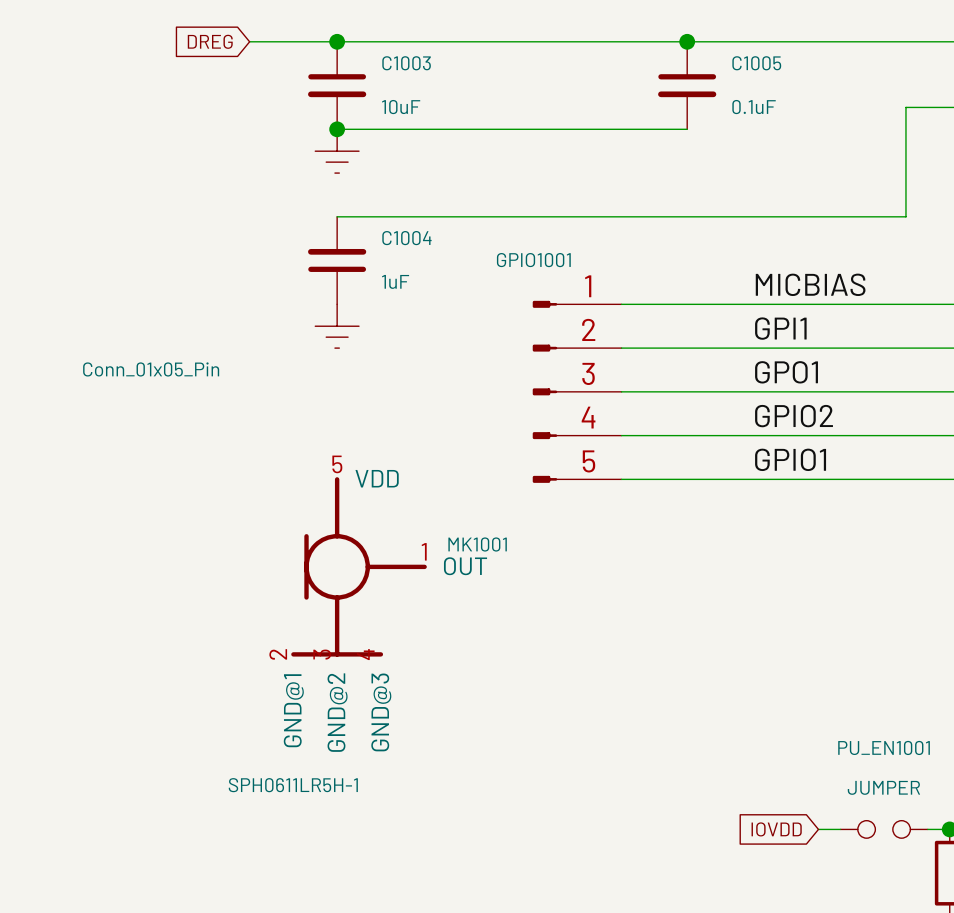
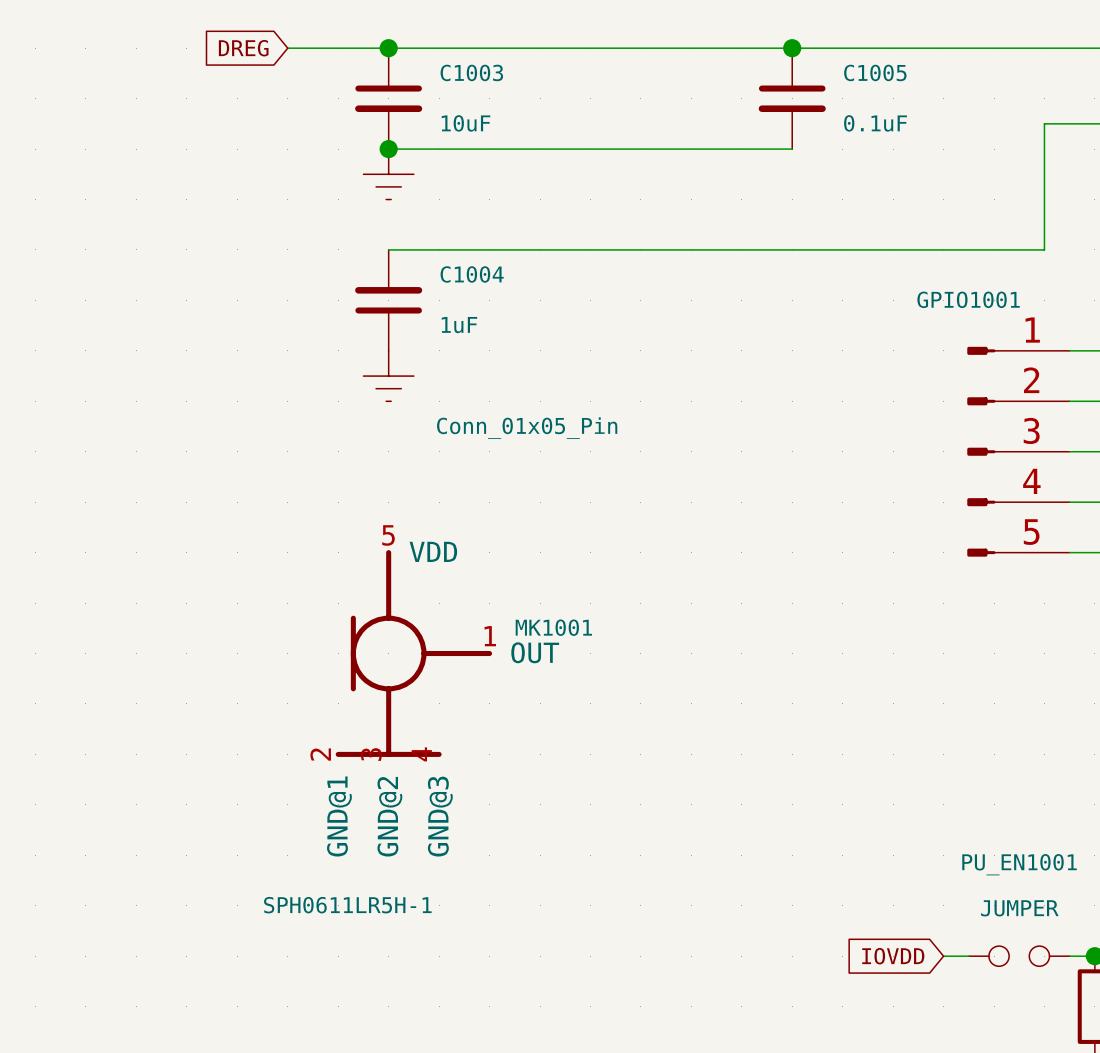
label: MICBIAS (810, 284) -> none
wire: (621, 304) (927, 304) -> none
label: GPI1 (780, 328) -> none
wire: (621, 348) (927, 348) -> none
label: GPO1 (786, 372) -> none
GPIO1001 position: (577, 391) -> (1018, 451)
wire: (621, 391) (927, 391) -> none
label: GPIO2 (794, 416) -> none
wire: (621, 435) (927, 435) -> none
label: GPIO1 (790, 459) -> none
wire: (621, 479) (927, 479) -> none

